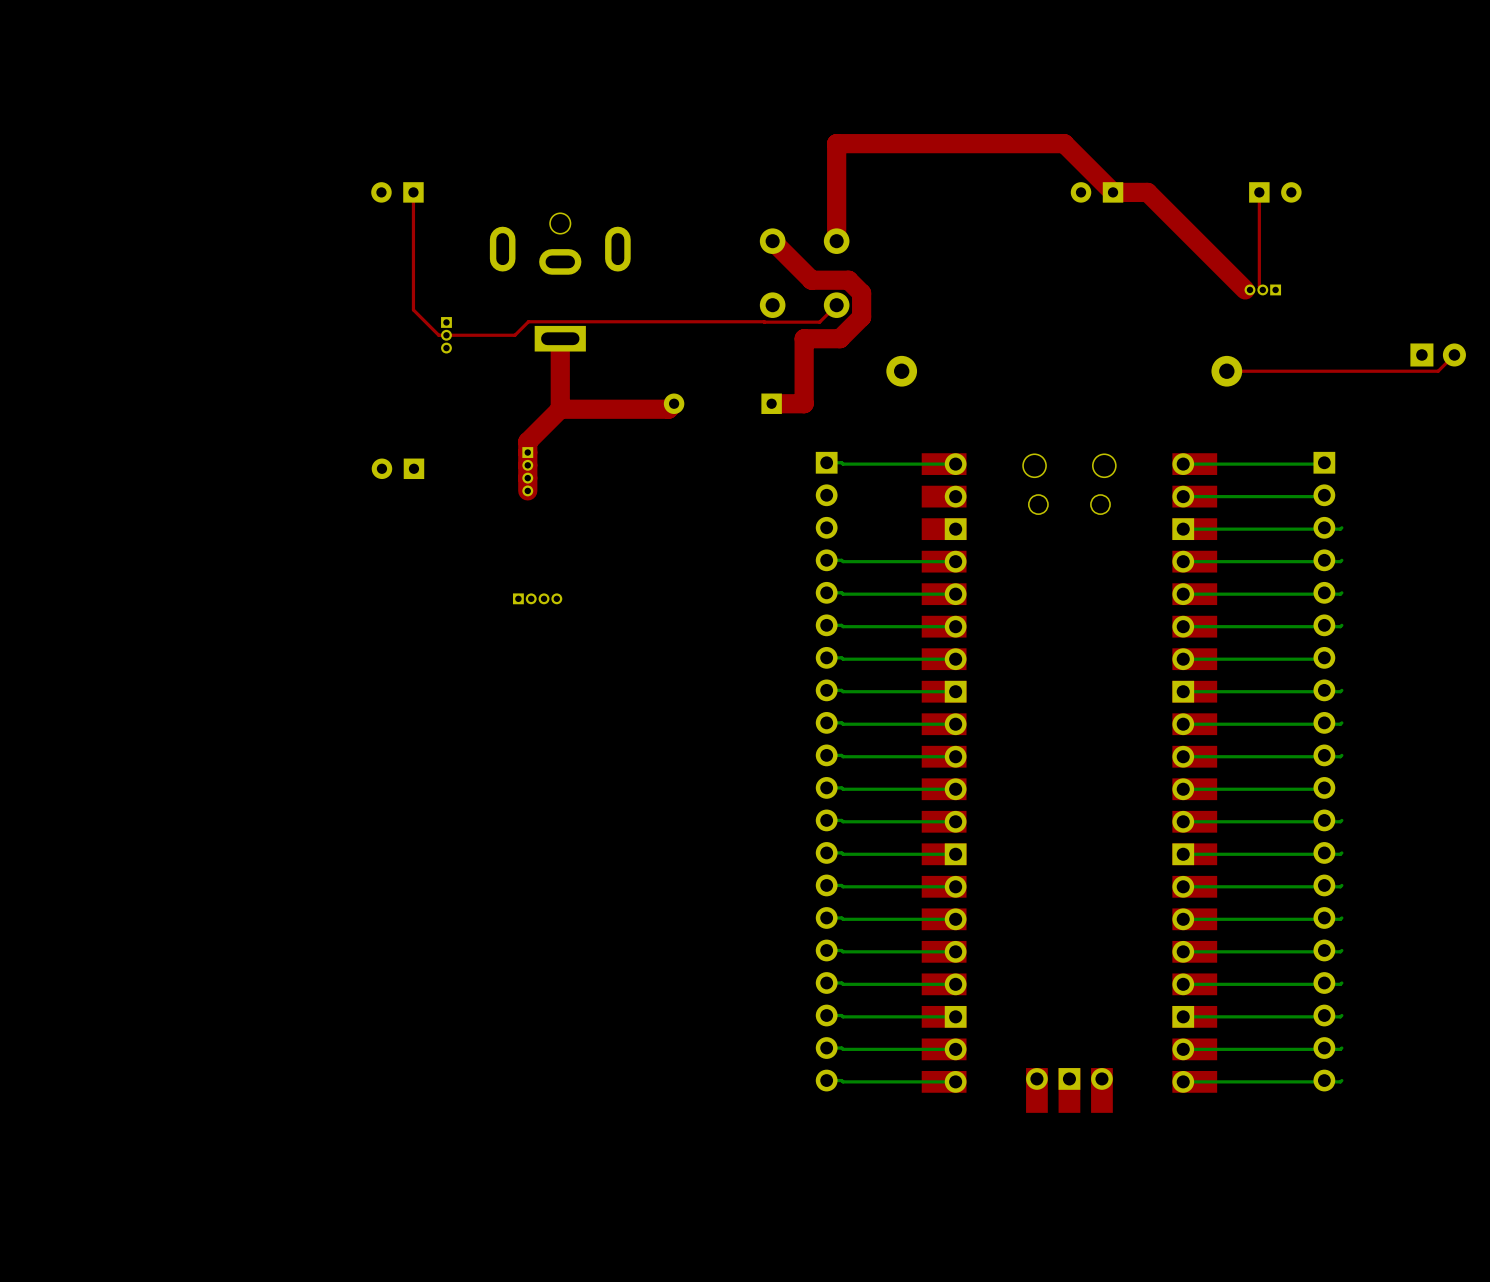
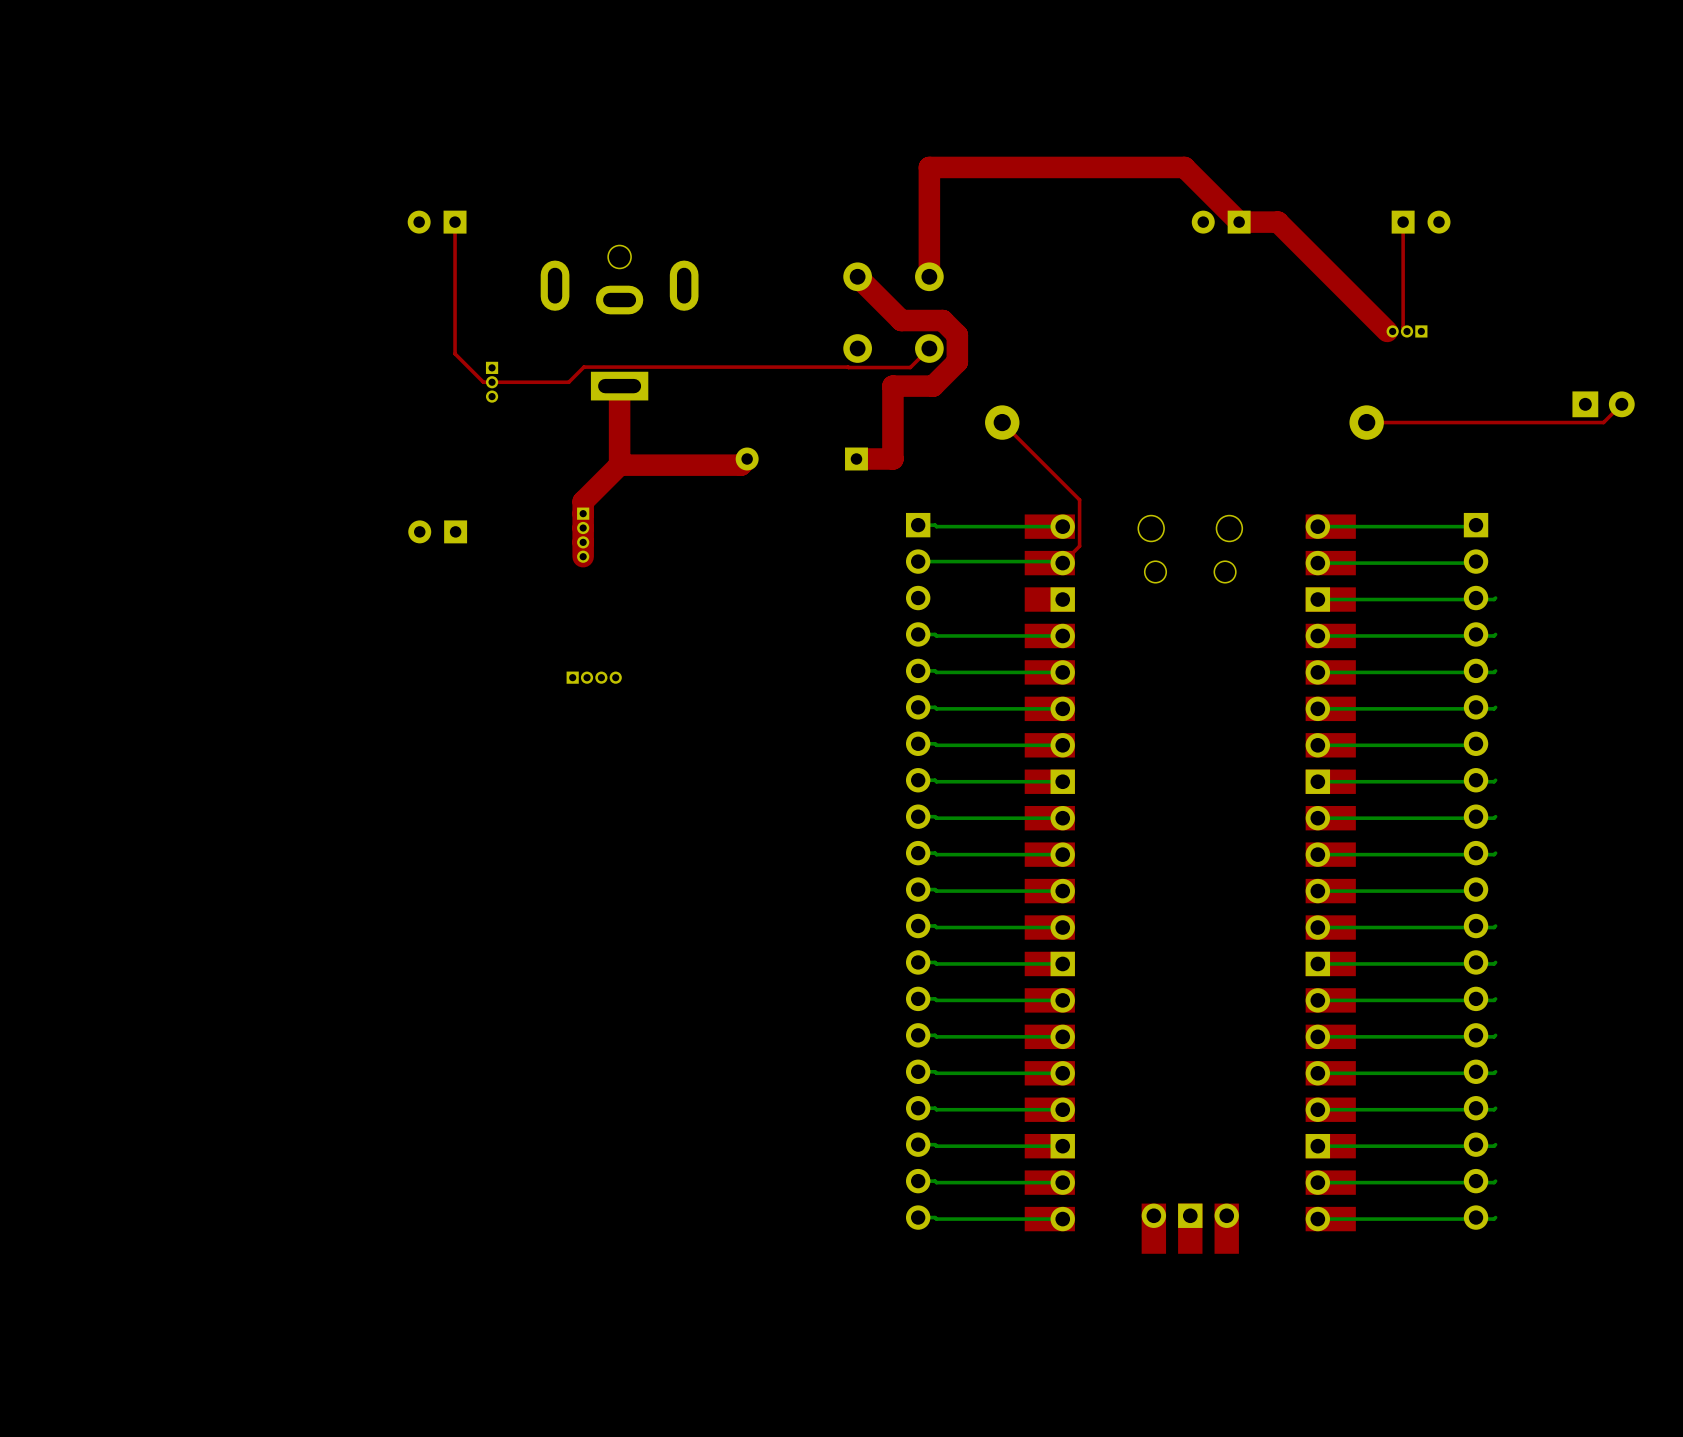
top track: none -> (1002, 422) (1079, 499) (1079, 546) (1062, 563)
bottom track: none -> (918, 561) (1062, 563)

